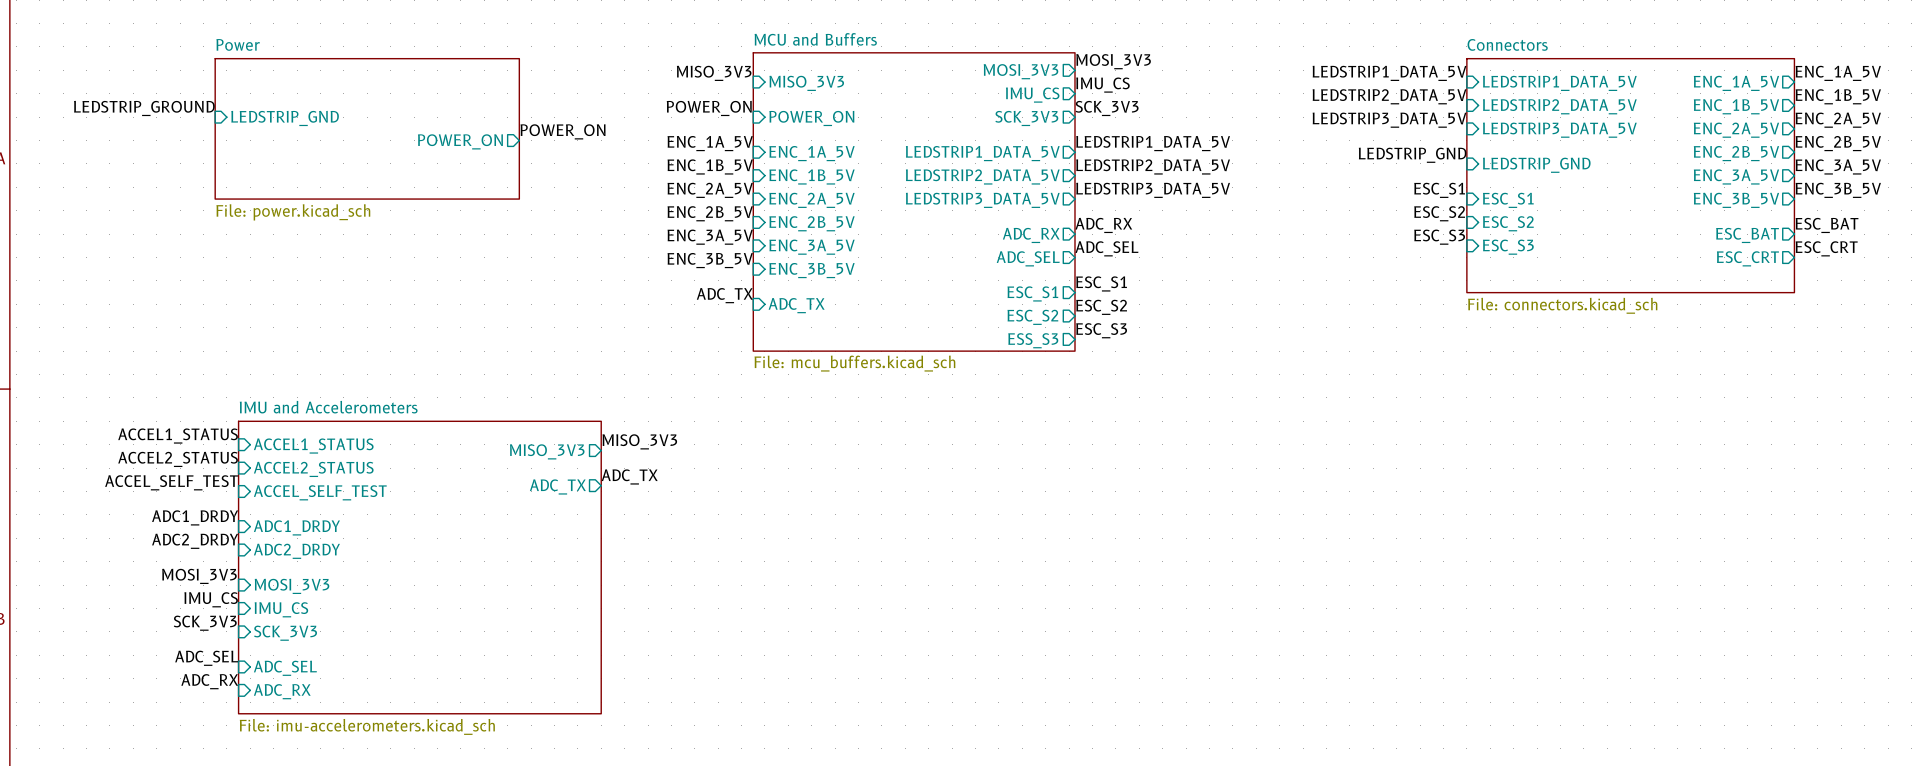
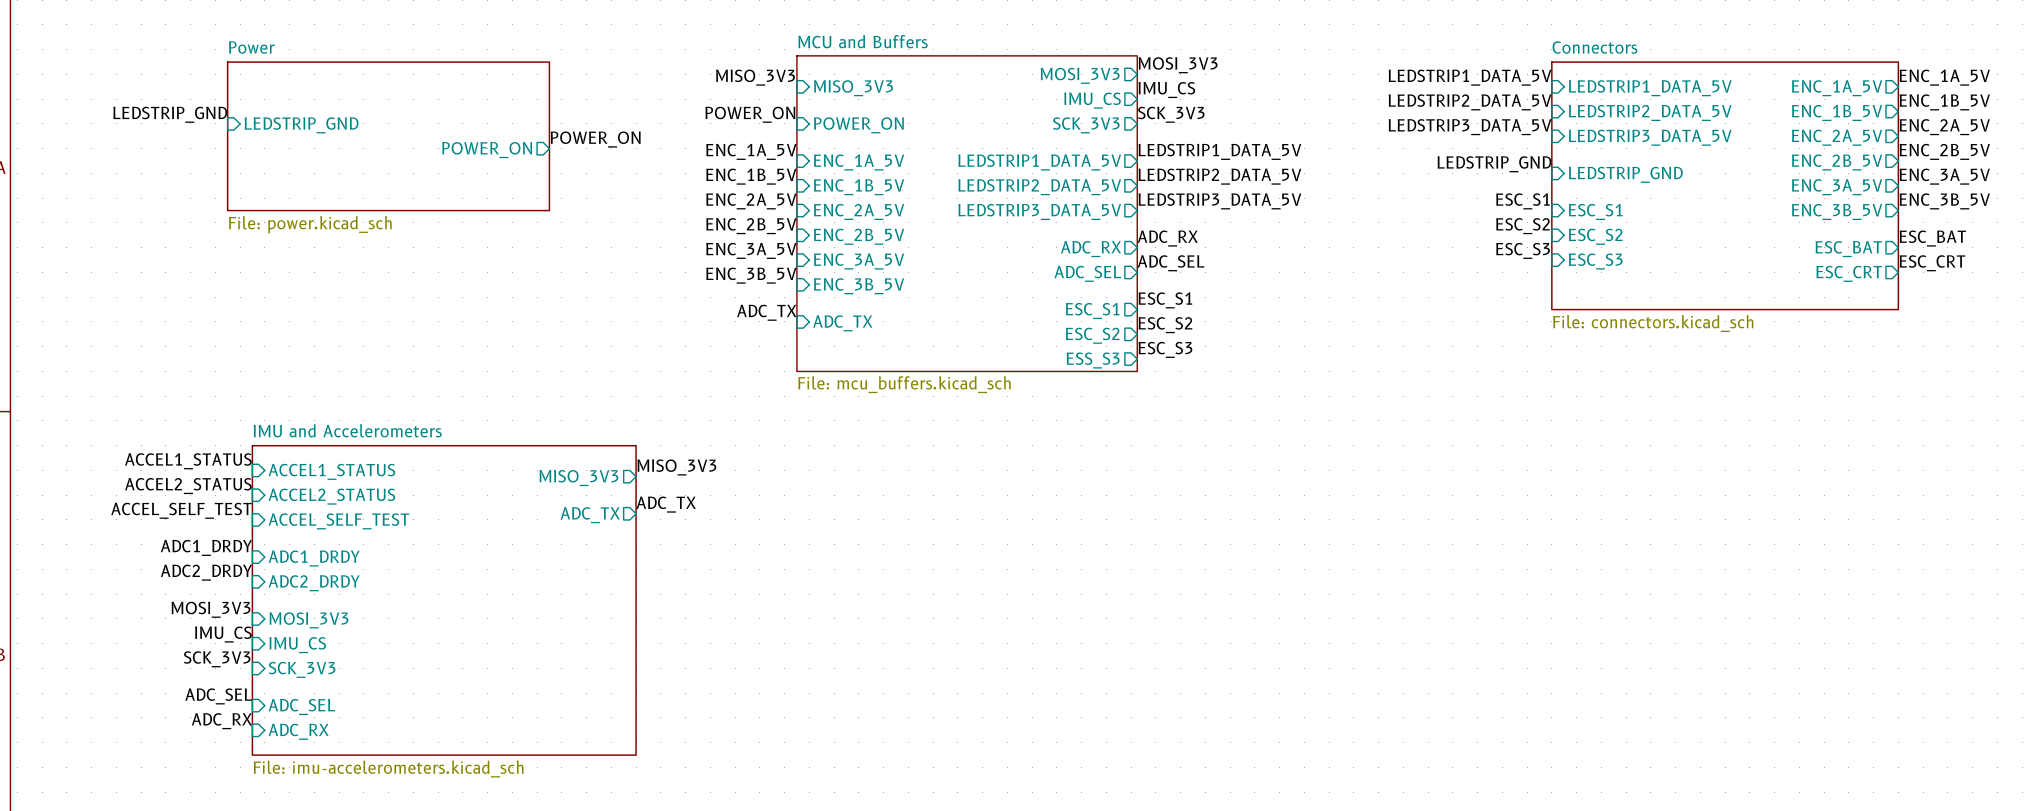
label: LEDSTRIP_GROUND (144, 108) -> LEDSTRIP_GND (170, 114)

